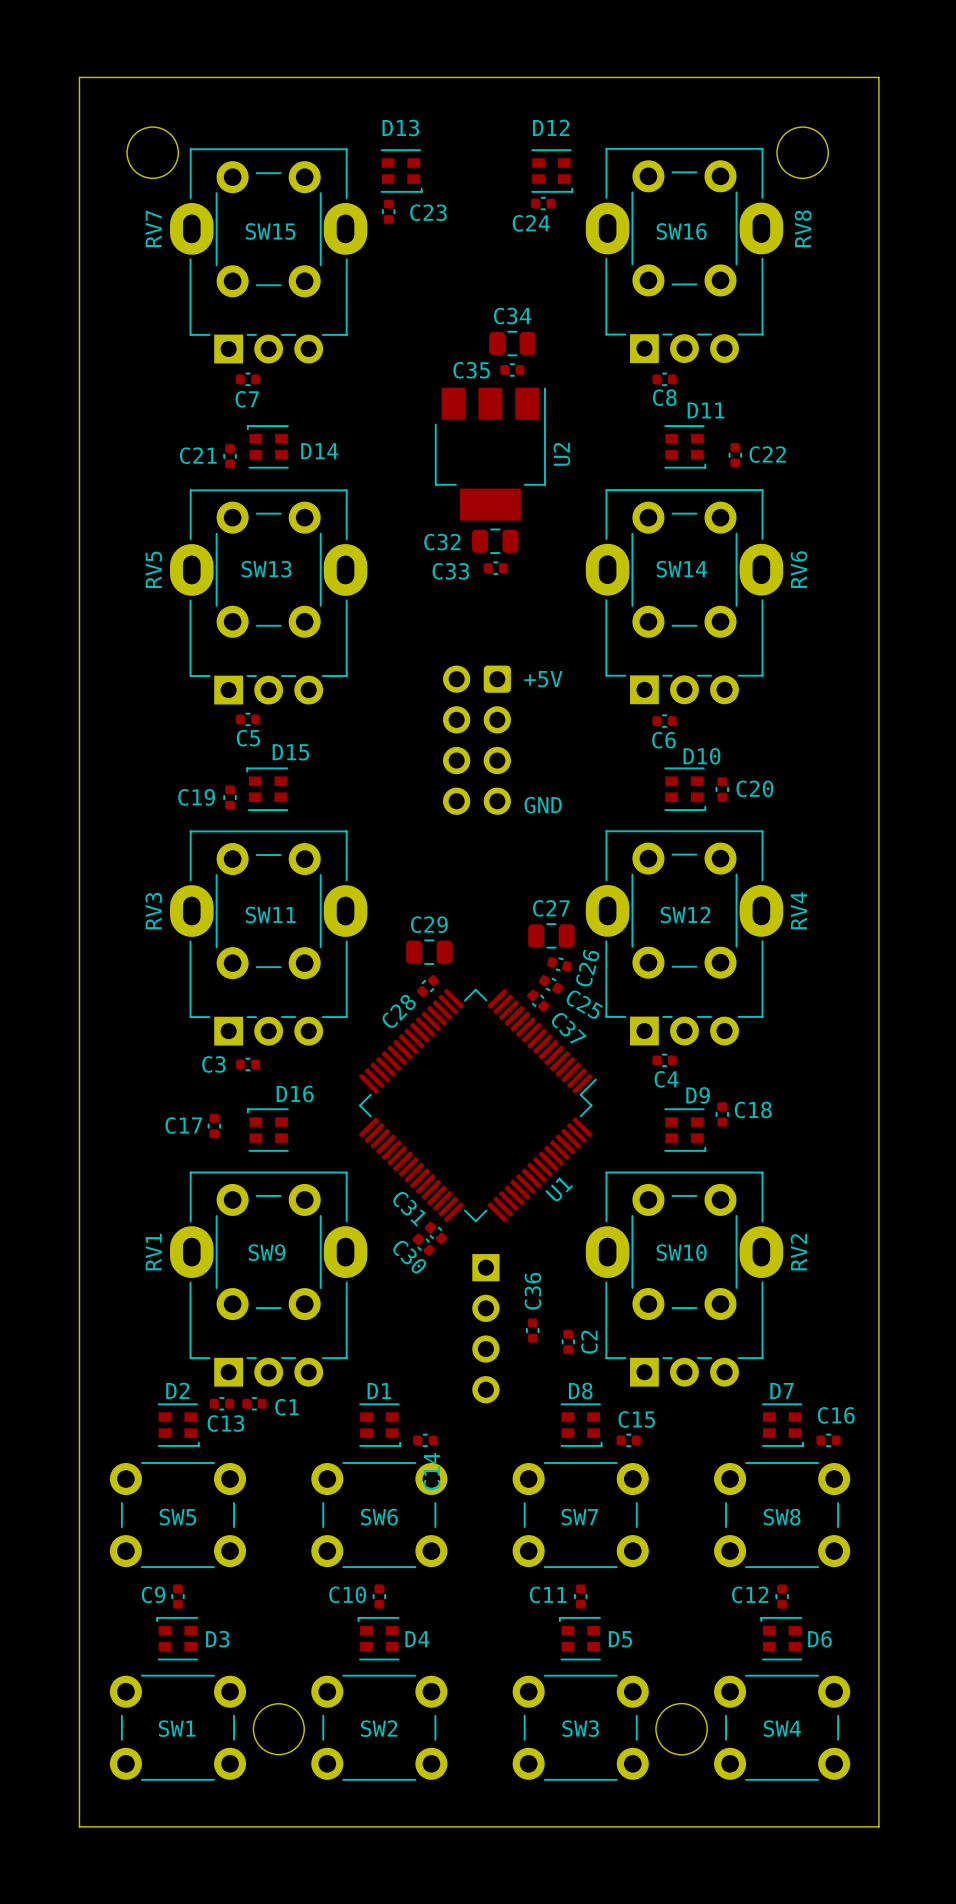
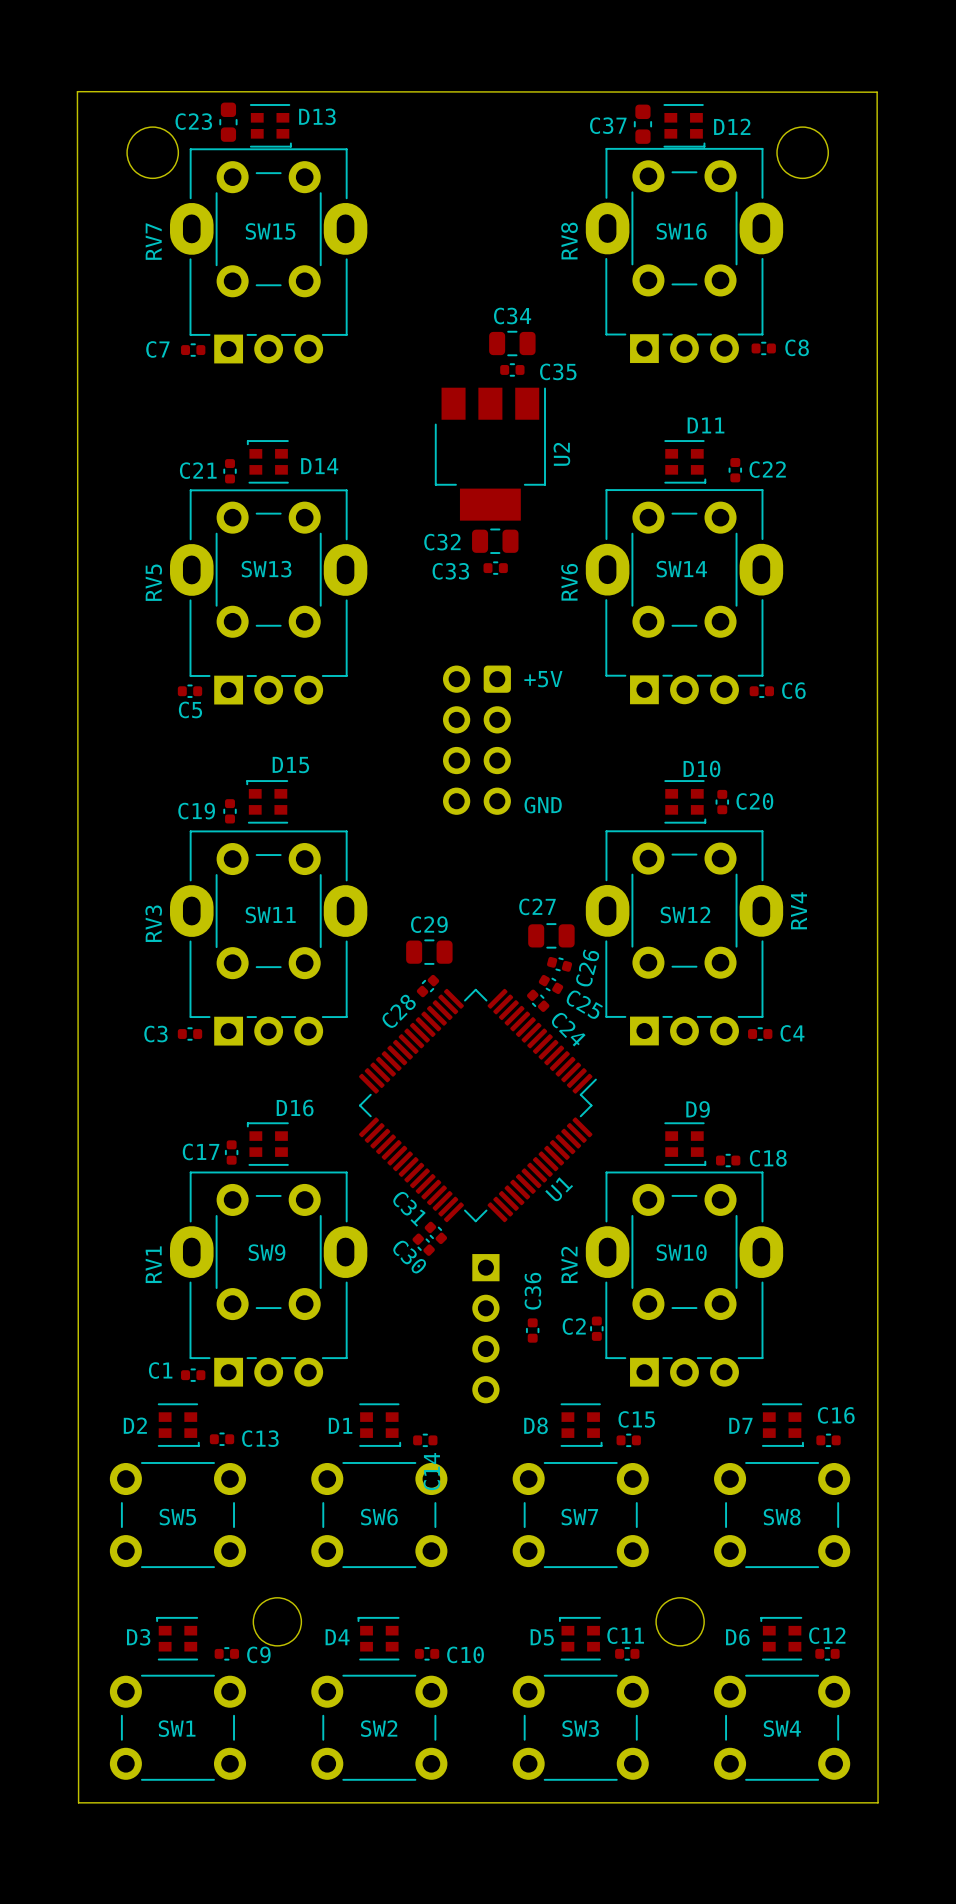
board edge: (79, 77) (79, 1826) (878, 1826) (878, 77) (79, 77) -> (77, 91) (78, 1802) (878, 1802) (877, 92) (77, 91)
C37: none -> (642, 124)
D13 name position: D13 (400, 127) -> D13 (317, 116)
D12 name position: D12 (551, 127) -> D12 (732, 126)
D13 position: (401, 171) -> (270, 125)
D12 position: (552, 171) -> (684, 125)
C23 footprint: [381, 199, 396, 224] -> [219, 102, 238, 142]
C24: (543, 203) -> none
C23 name position: C23 (428, 212) -> C23 (193, 121)
RV7 name position: RV7 (153, 228) -> RV7 (153, 241)
RV8 name position: RV8 (803, 228) -> RV8 (569, 241)
C35 name position: C35 (471, 370) -> C35 (558, 371)
C7 position: (247, 379) -> (193, 350)
C8 position: (664, 379) -> (763, 348)
C8 name position: C8 (664, 397) -> C8 (797, 347)
C7 name position: C7 (247, 399) -> C7 (157, 349)
D14 position: (267, 446) -> (267, 461)
D11 position: (685, 446) -> (685, 461)
C22 position: (735, 455) -> (735, 470)
C21 position: (230, 456) -> (230, 471)
RV5 name position: RV5 (153, 569) -> RV5 (153, 582)
RV6 name position: RV6 (799, 569) -> RV6 (569, 582)
C5 position: (247, 719) -> (190, 691)
C6 position: (664, 721) -> (761, 691)
C6 name position: C6 (663, 740) -> C6 (793, 690)
D15 position: (267, 789) -> (267, 801)
D10 position: (685, 789) -> (685, 801)
C20 position: (722, 789) -> (722, 802)
C19 position: (230, 797) -> (230, 811)
C27 name position: C27 (551, 908) -> C27 (537, 906)
RV3 name position: RV3 (153, 911) -> RV3 (153, 923)
C37 name: C37 (569, 1028) -> C24 (568, 1029)
C4 position: (664, 1060) -> (760, 1034)
C3 position: (247, 1064) -> (190, 1034)
C4 name position: C4 (666, 1079) -> C4 (792, 1033)
C18 rotation: 0° (722, 1114) -> 90° clockwise (728, 1160)
C18 position: (722, 1114) -> (728, 1160)
C17 position: (214, 1126) -> (231, 1152)
D16 position: (267, 1130) -> (267, 1144)
D9 position: (685, 1130) -> (685, 1144)
RV1 name position: RV1 (153, 1252) -> RV1 (153, 1264)
RV2 name position: RV2 (798, 1252) -> RV2 (569, 1264)
C2 position: (568, 1341) -> (596, 1328)
C2 name rotation: 0° (589, 1342) -> 90° clockwise (574, 1326)
D2 name position: D2 (177, 1390) -> D2 (135, 1425)
D1 name position: D1 (379, 1390) -> D1 (340, 1425)
D8 name position: D8 (580, 1390) -> D8 (536, 1425)
D7 name position: D7 (782, 1390) -> D7 (740, 1425)
C13 position: (221, 1403) -> (222, 1439)
C1 position: (254, 1403) -> (193, 1375)
C1 name position: C1 (286, 1407) -> C1 (160, 1370)
C13 name position: C13 (225, 1423) -> C13 (260, 1438)
C9 name position: C9 (153, 1594) -> C9 (258, 1654)
C10 name position: C10 (347, 1594) -> C10 (465, 1654)
C9 rotation: 0° (177, 1596) -> 90° clockwise (226, 1653)
C9 position: (177, 1596) -> (226, 1653)
C10 rotation: 0° (379, 1596) -> 90° clockwise (427, 1653)
C10 position: (379, 1596) -> (427, 1653)
C11 rotation: 0° (580, 1596) -> 90° clockwise (627, 1653)
C11 position: (580, 1596) -> (627, 1653)
C12 rotation: 0° (782, 1596) -> 90° clockwise (827, 1653)
C12 position: (782, 1596) -> (827, 1653)
round board edge: none -> [252, 1597, 302, 1647]
round board edge: none -> [655, 1597, 705, 1647]
D3 name position: D3 (217, 1639) -> D3 (138, 1637)
D4 name position: D4 (417, 1639) -> D4 (337, 1637)
D5 name position: D5 (620, 1639) -> D5 (542, 1637)
D6 name position: D6 (819, 1639) -> D6 (737, 1637)
round board edge: [253, 1703, 305, 1756] -> none
round board edge: [655, 1703, 708, 1756] -> none

